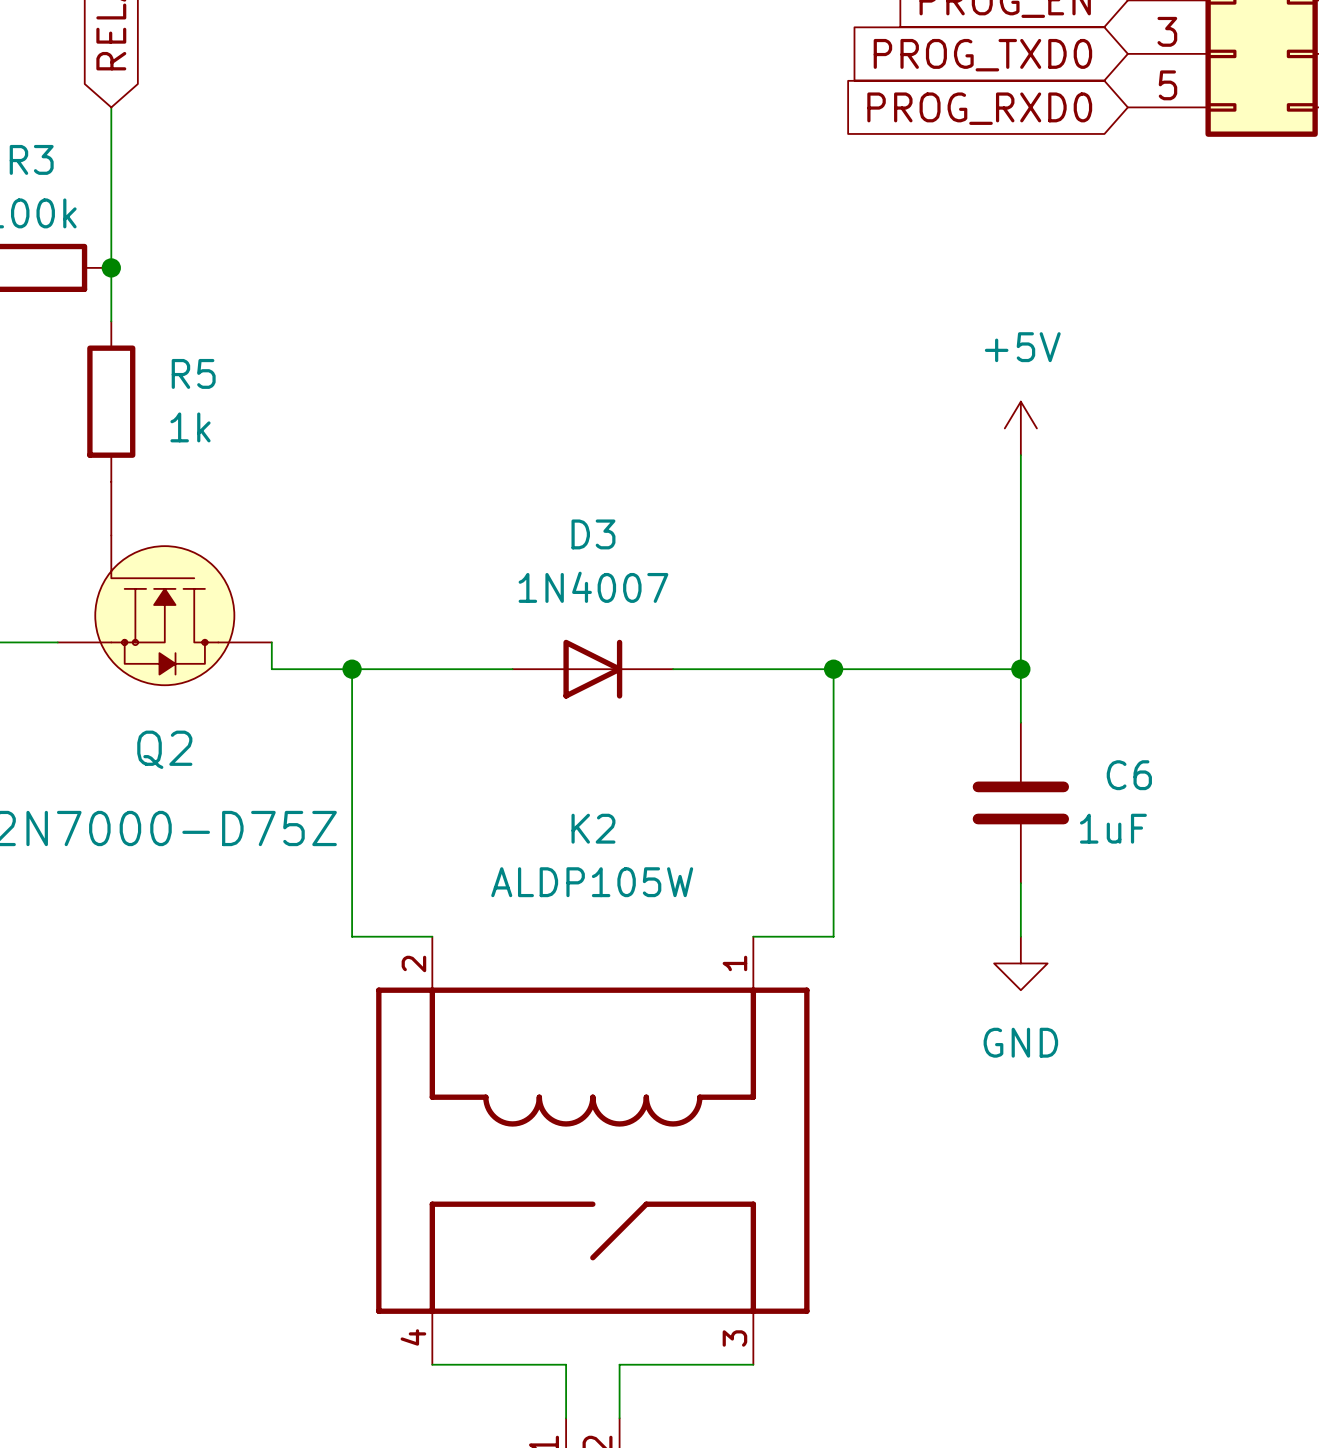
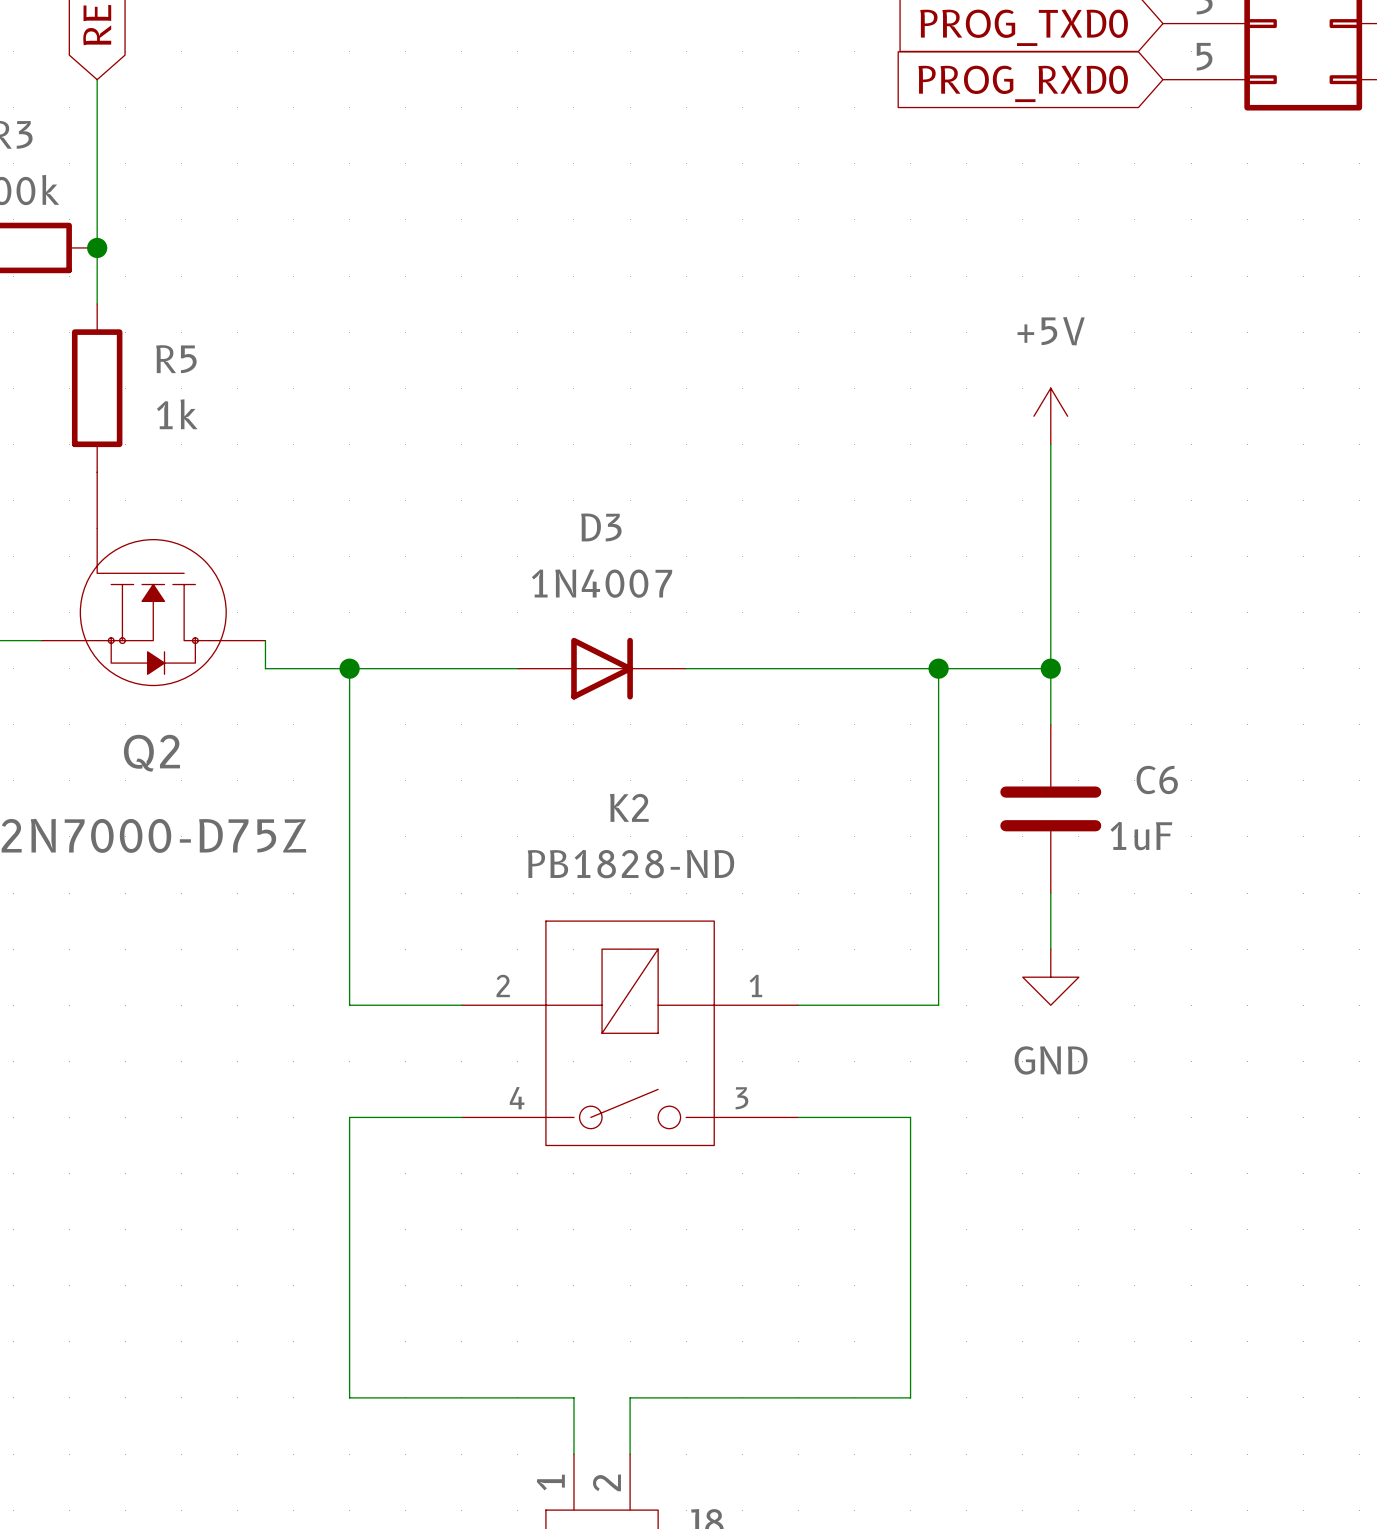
wire: (833, 669) (833, 936) (753, 936) -> none
junction position: (833, 669) -> (938, 668)
wire: none -> (938, 668) (938, 1005) (798, 1005)
K2 name position: K2 (593, 828) -> K2 (629, 807)
K2 value: ALDP105W (592, 882) -> PB1828-ND (630, 864)
wire: (352, 936) (432, 936) -> (349, 949) (349, 1005) (461, 1005)
K2 symbol: [376, 936, 810, 1365] -> [461, 921, 799, 1146]
wire: none -> (461, 1117) (349, 1117) (349, 1397) (433, 1397)
wire: none -> (798, 1117) (910, 1117) (910, 1397) (770, 1397)

